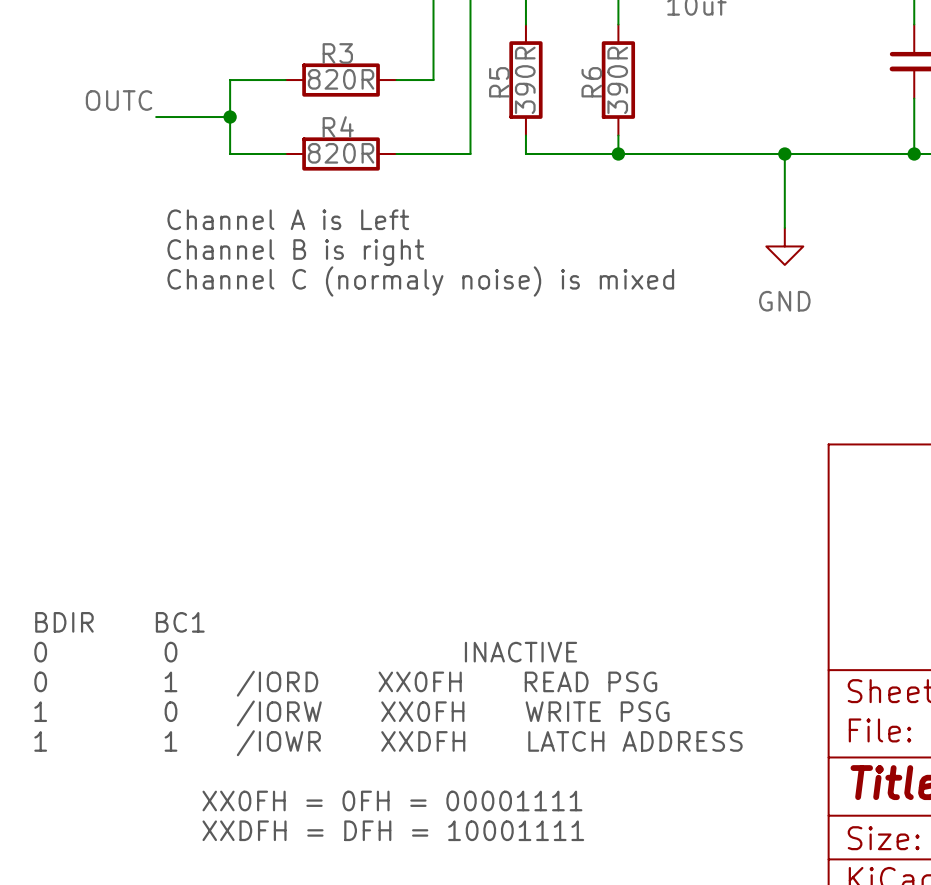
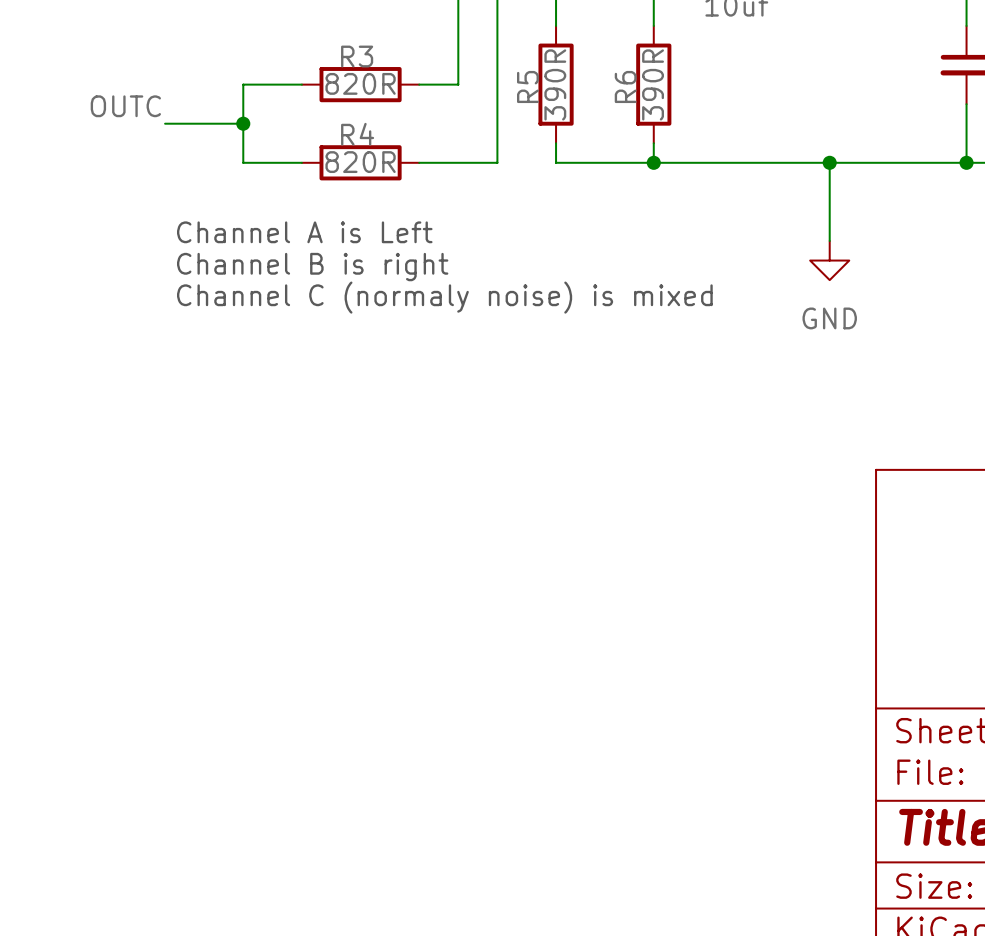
text: BDIR BC1 (119, 622) -> none
text: 0 0 INACTIVE (305, 652) -> none
text: 0 1 /IORD XX0FH READ PSG (345, 683) -> none
text: 1 0 /IORW XX0FH WRITE PSG (351, 713) -> none
text: 1 1 /IOWR XXDFH LATCH ADDRESS (388, 743) -> none
text: XX0FH = 0FH = 00001111 (392, 800) -> none
text: XXDFH = DFH = 10001111 (393, 830) -> none

